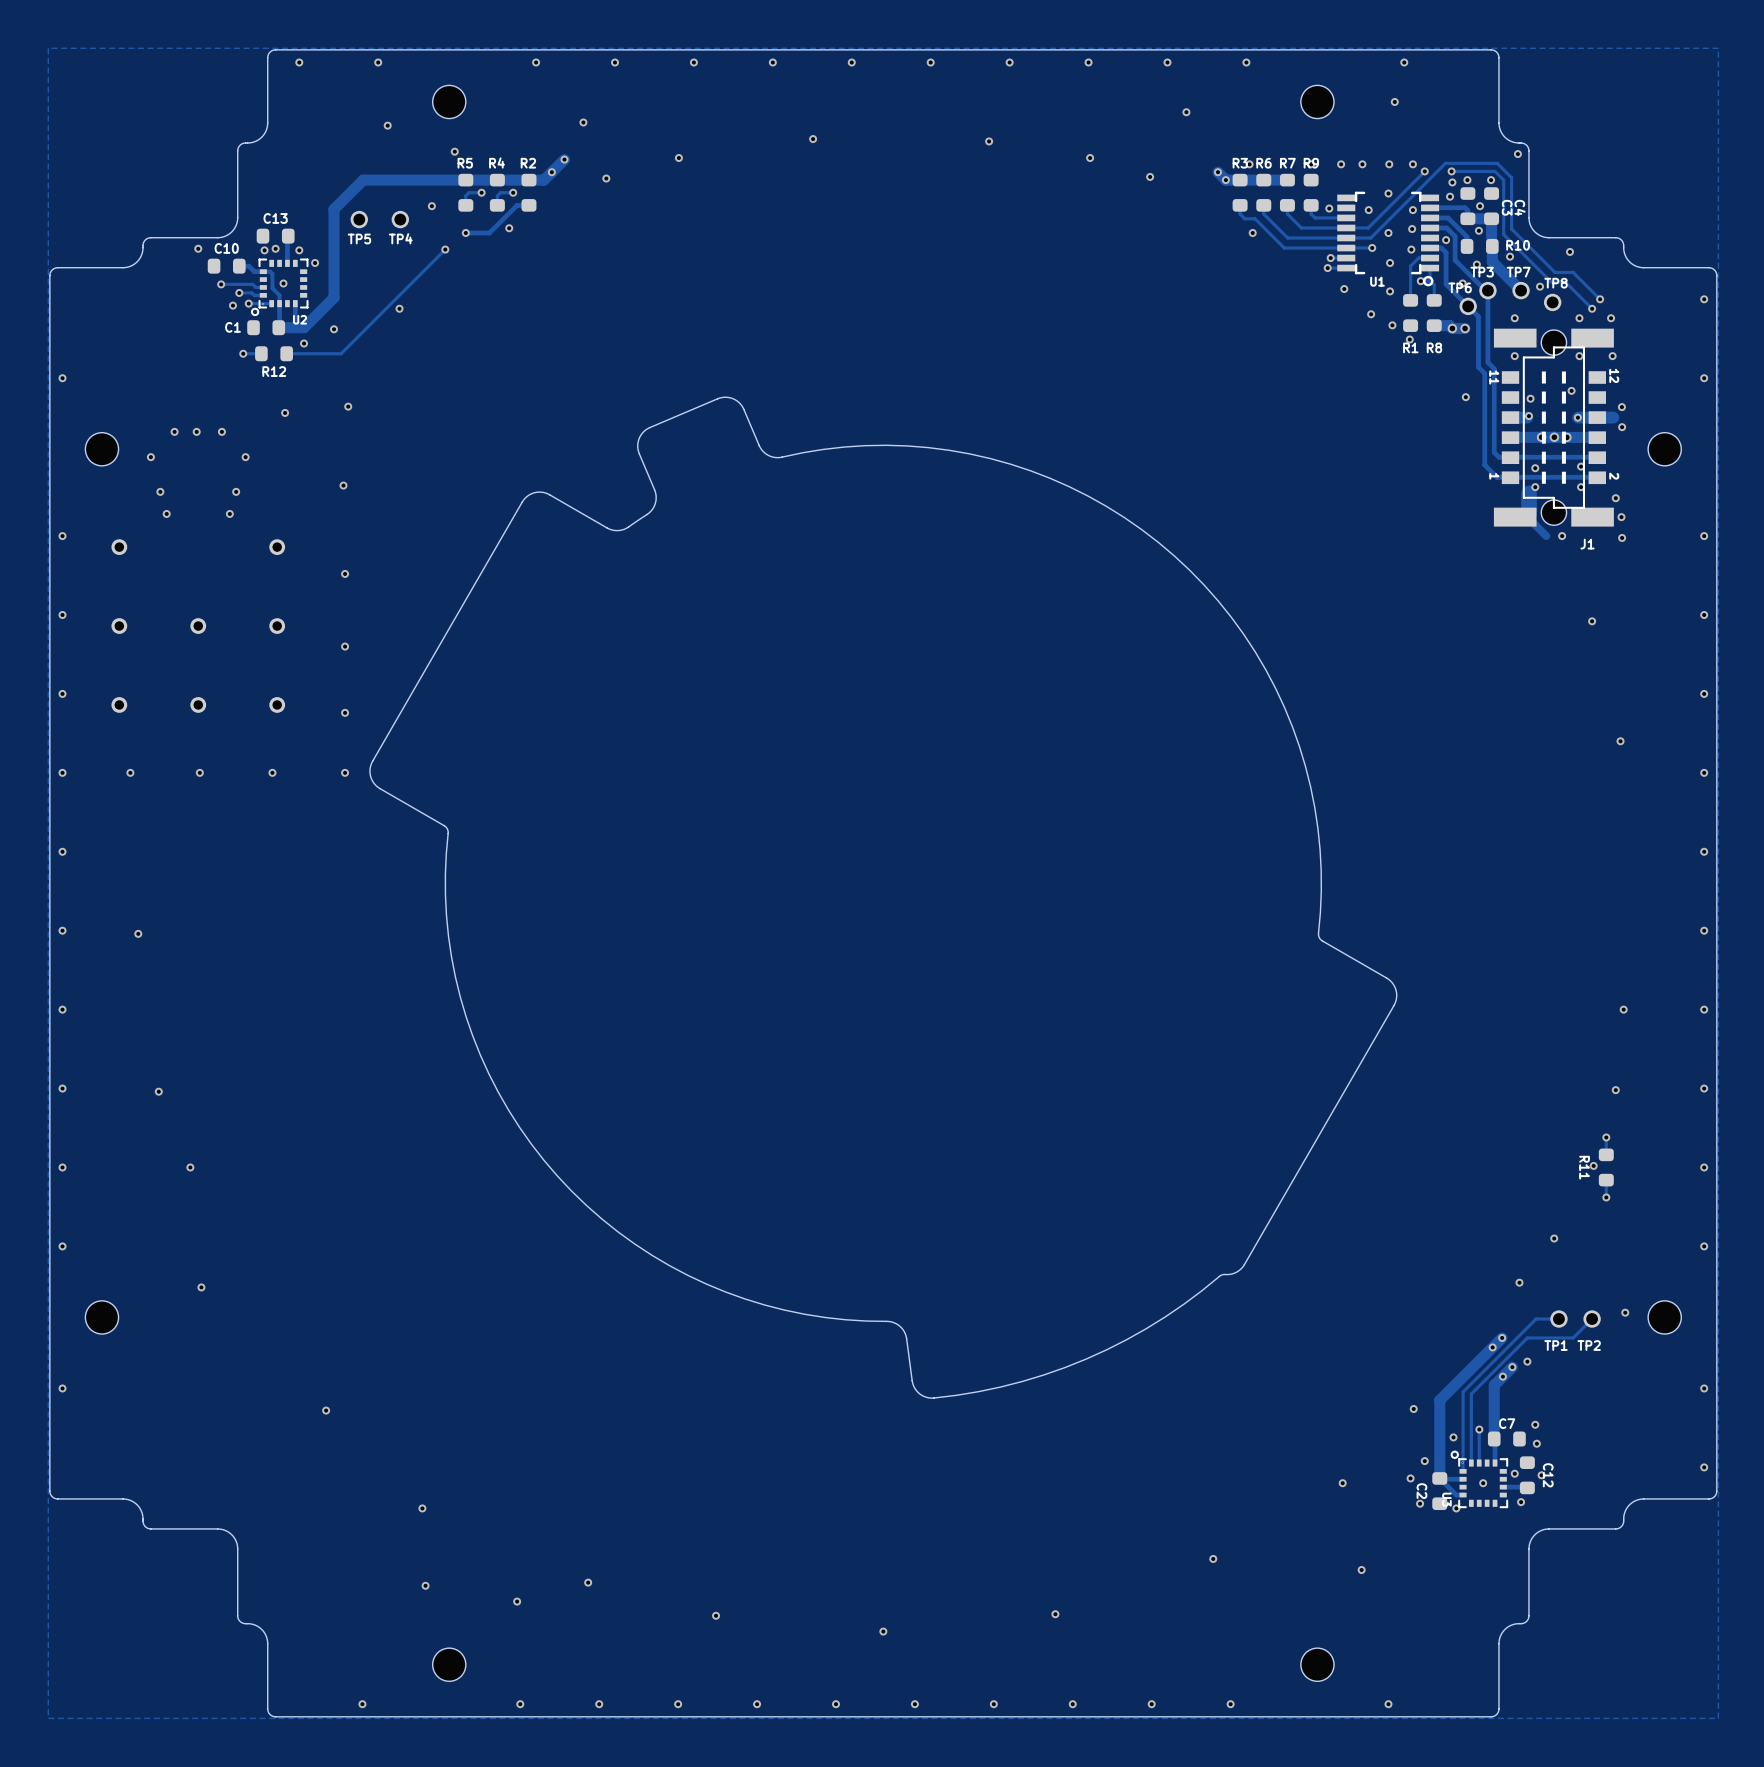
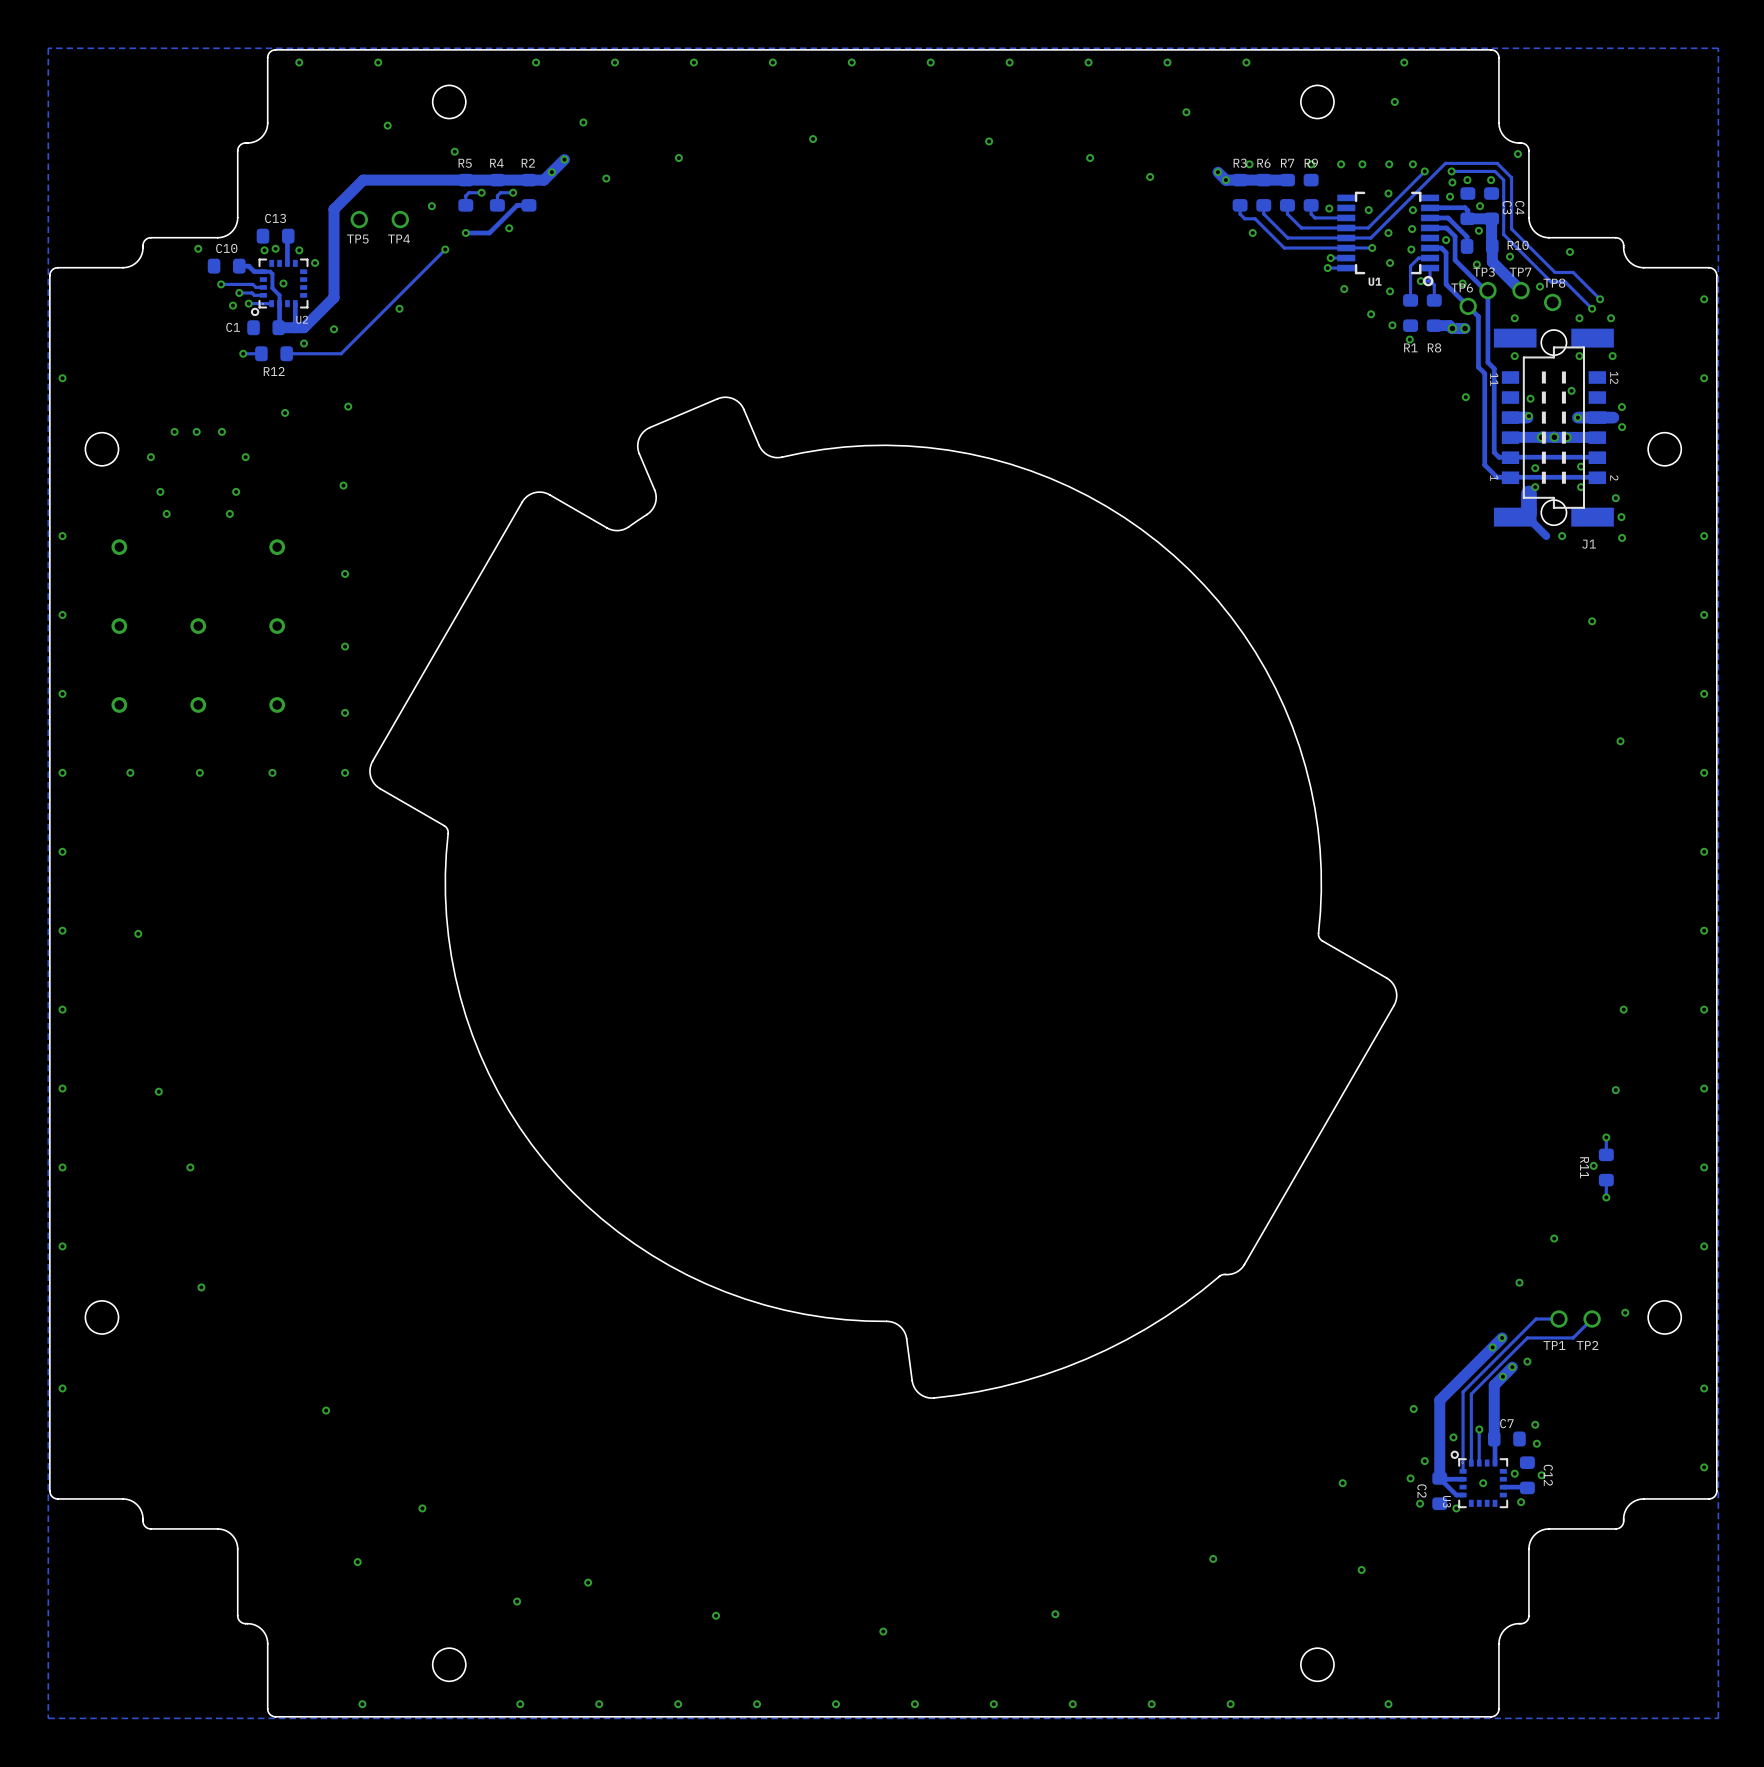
via position: (425, 1585) -> (357, 1562)

